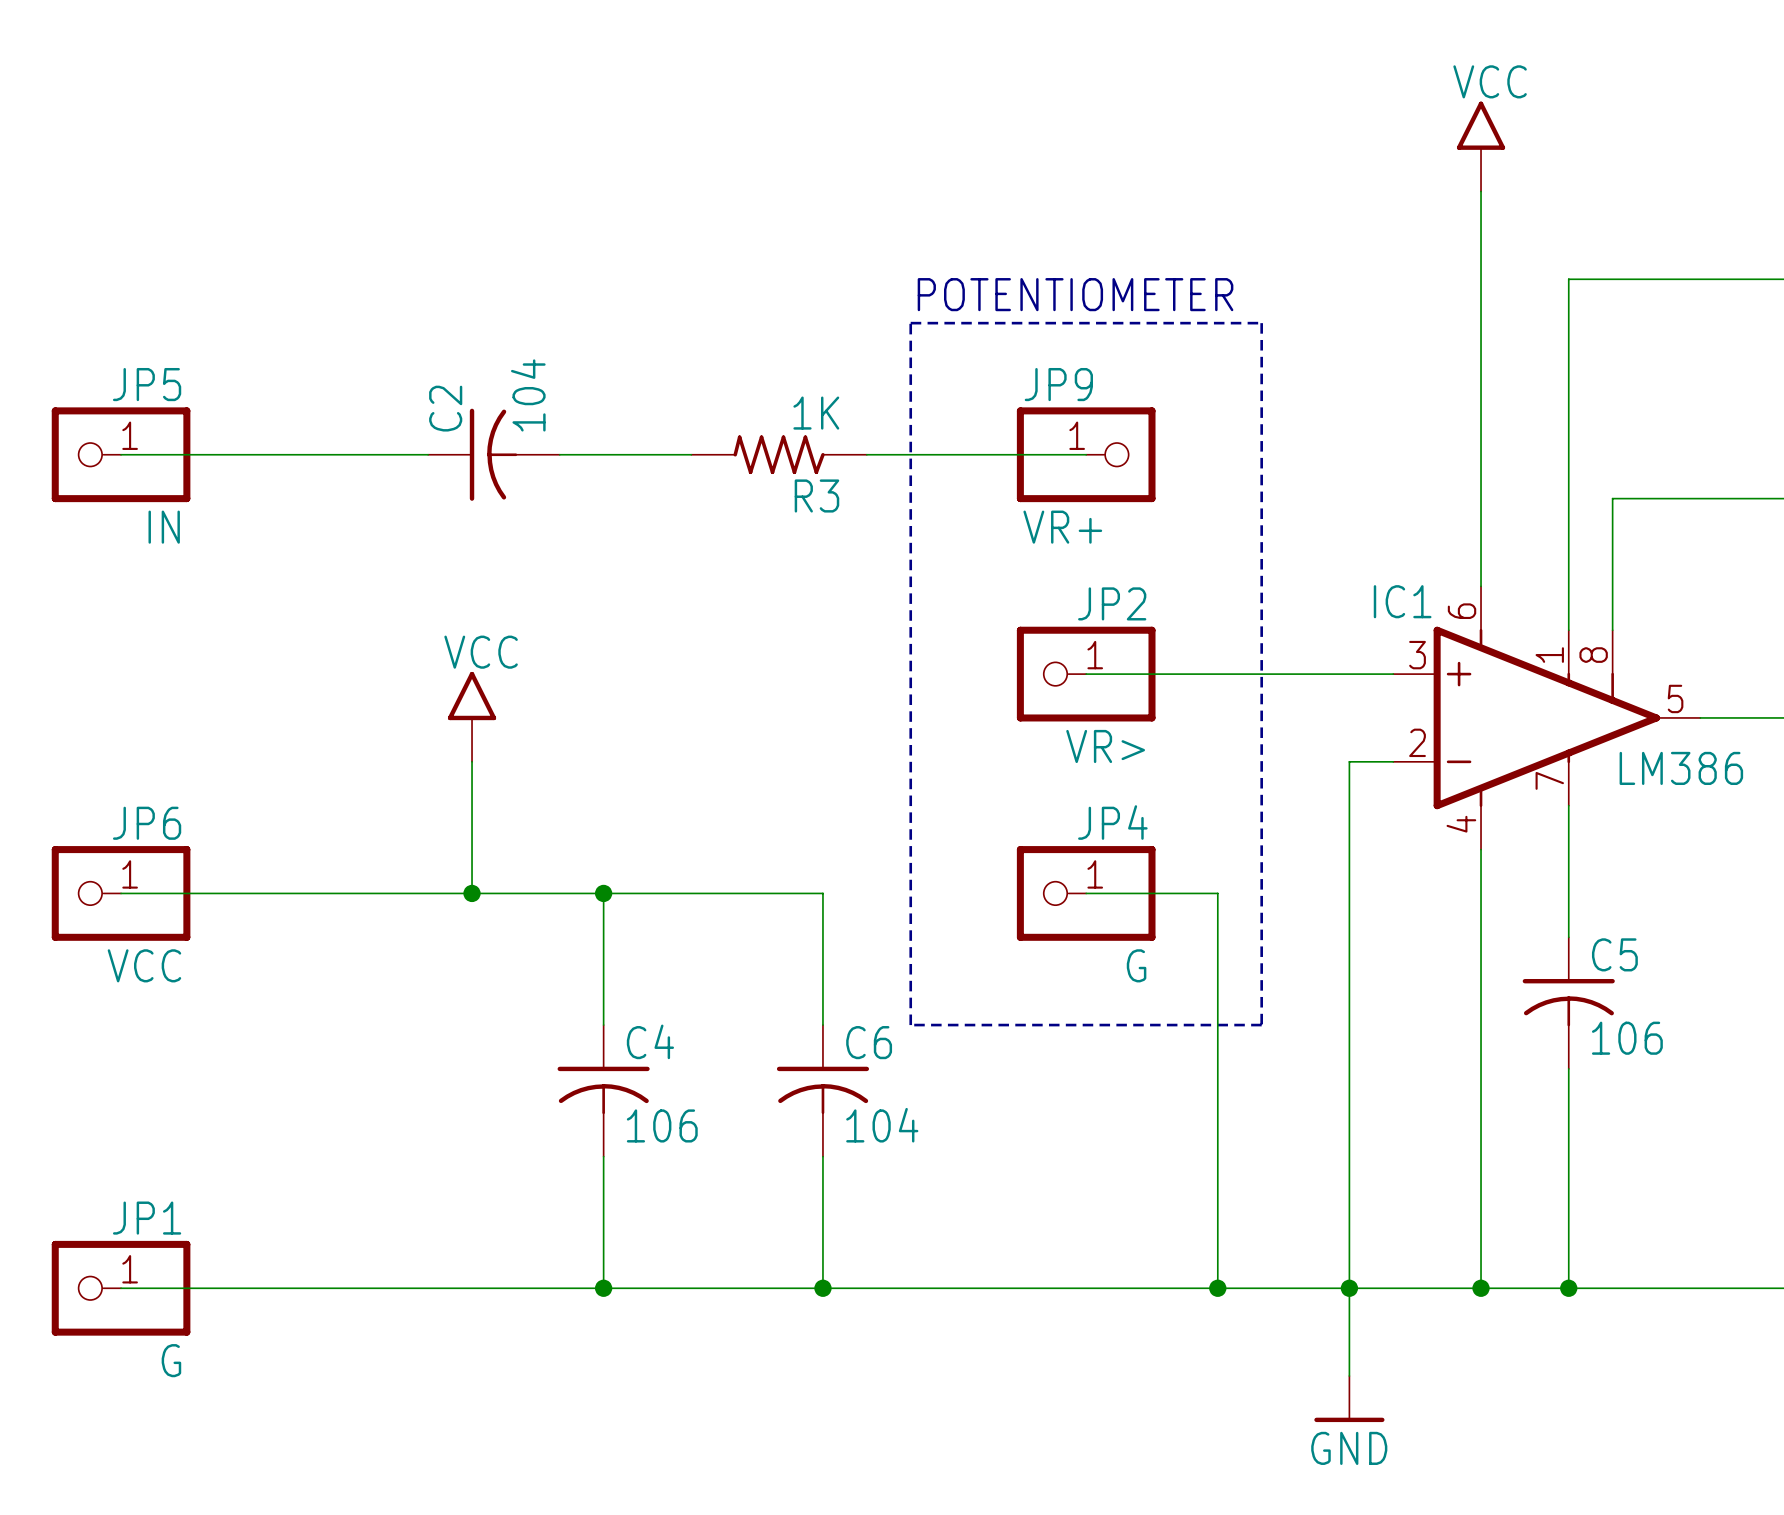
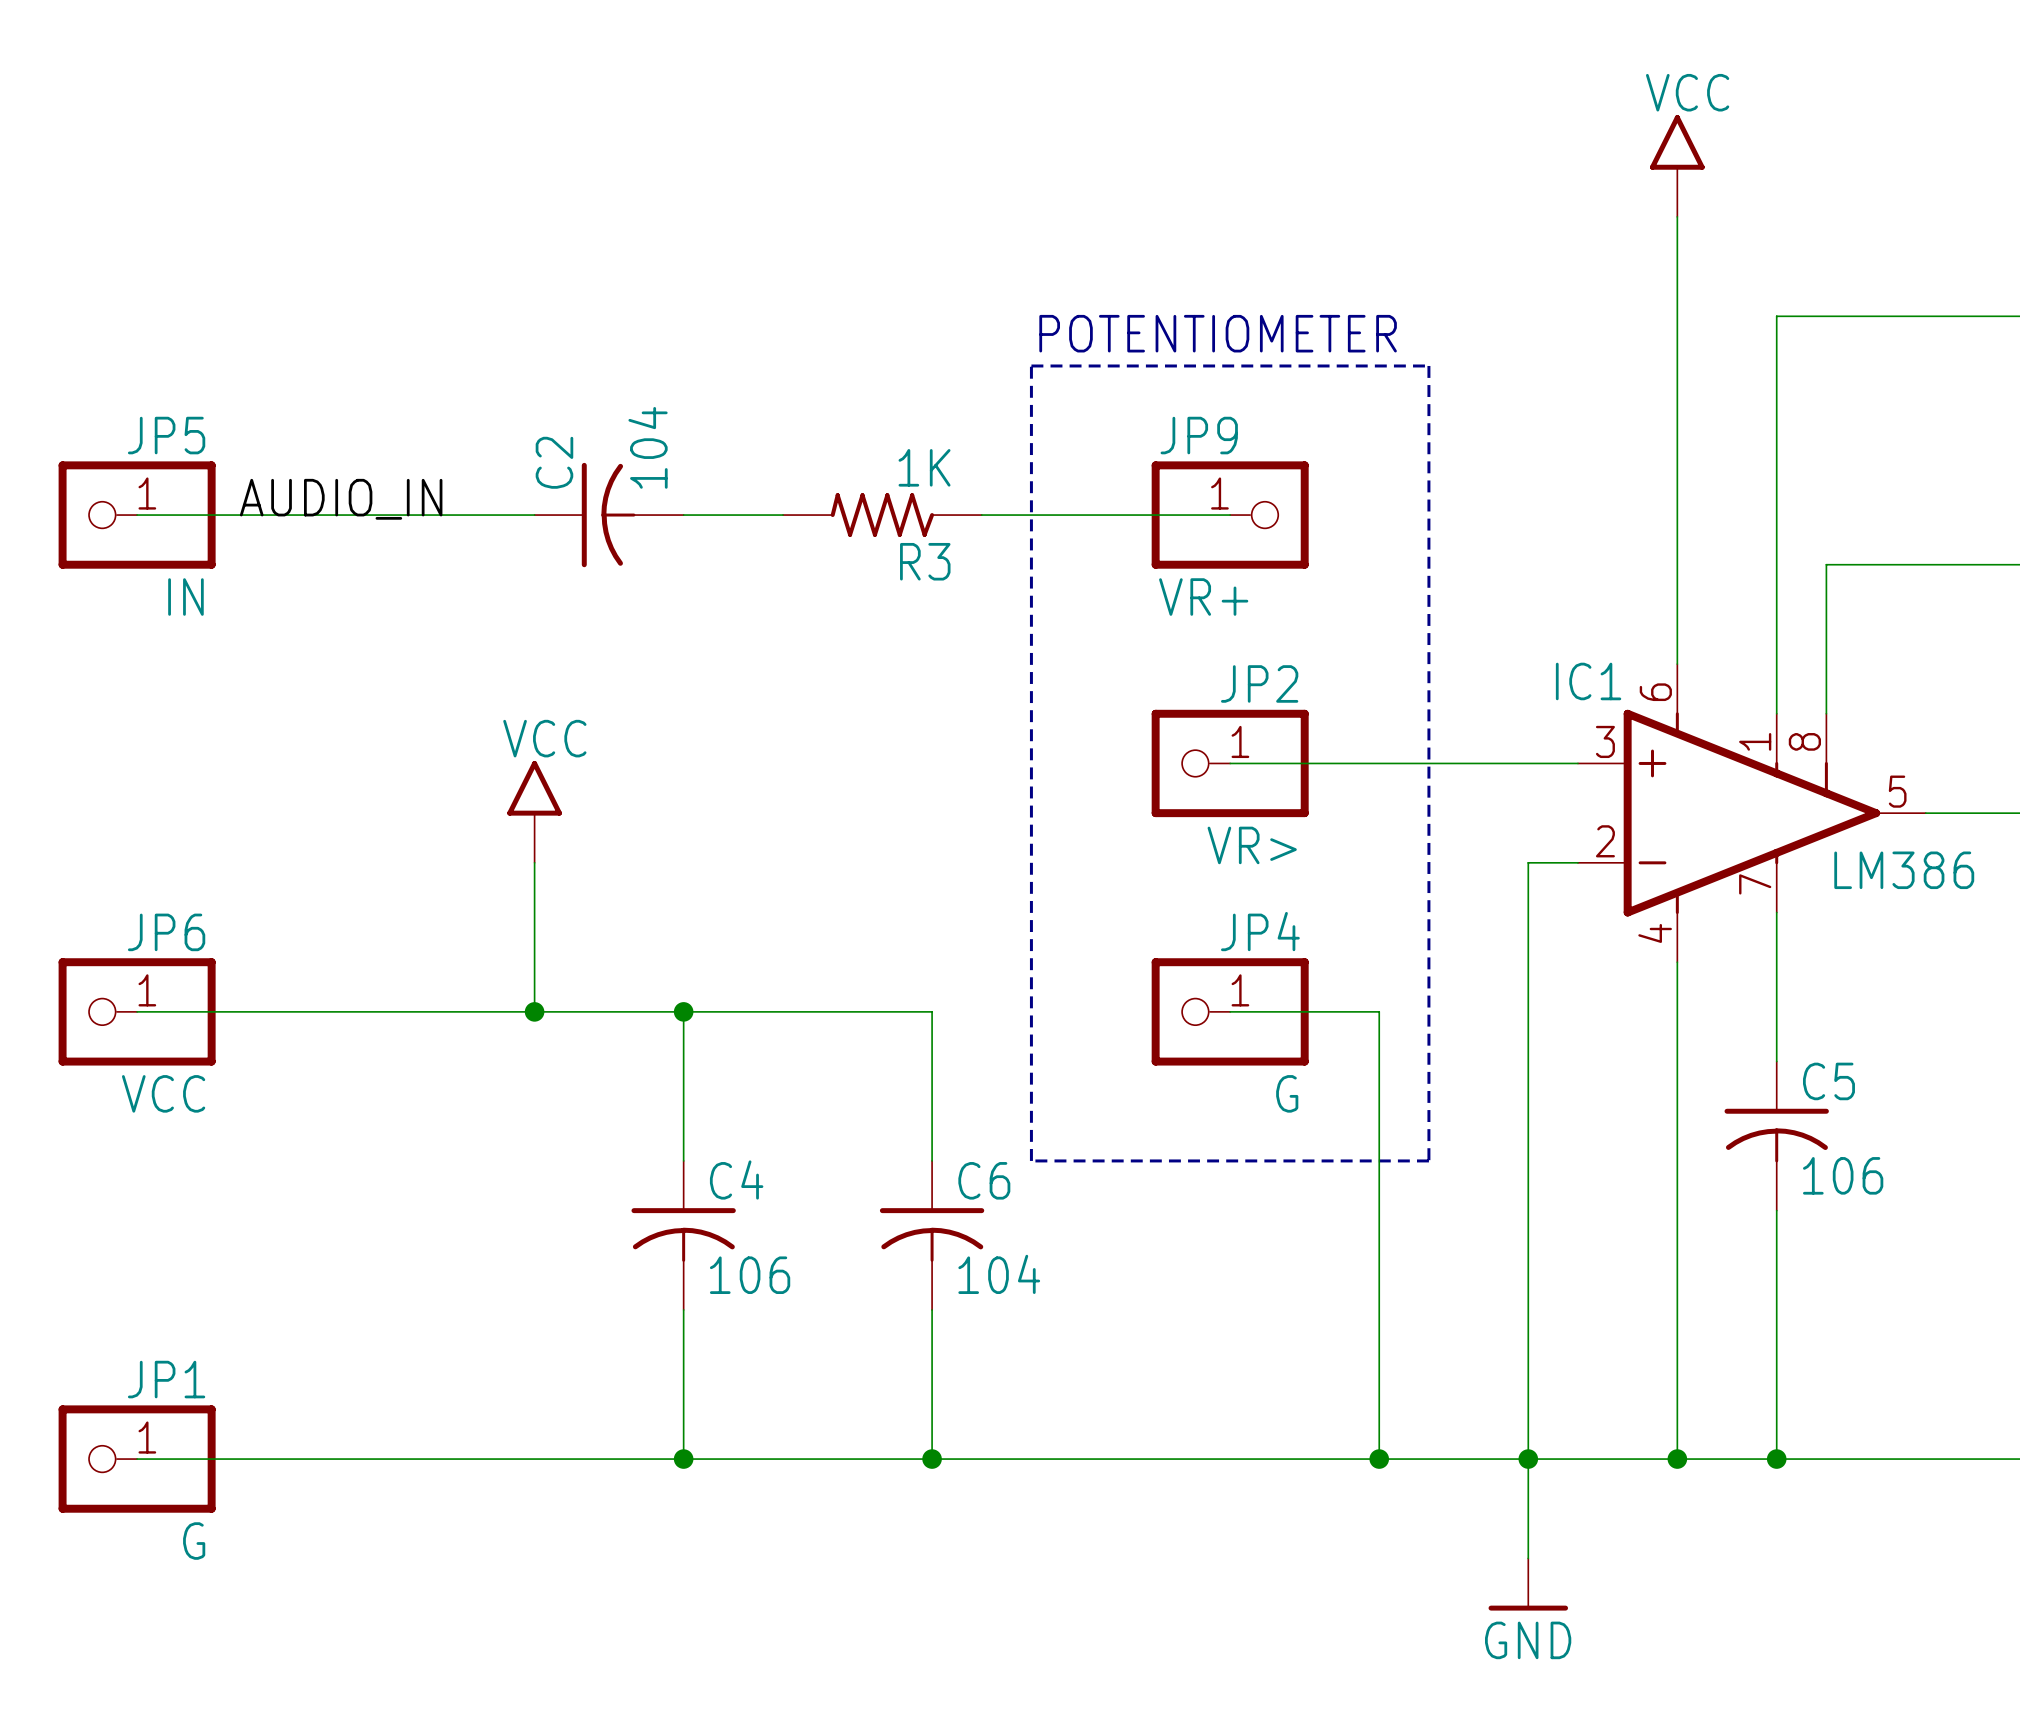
label: none -> AUDIO_IN (341, 499)
C2 position: (493, 454) -> (609, 515)

